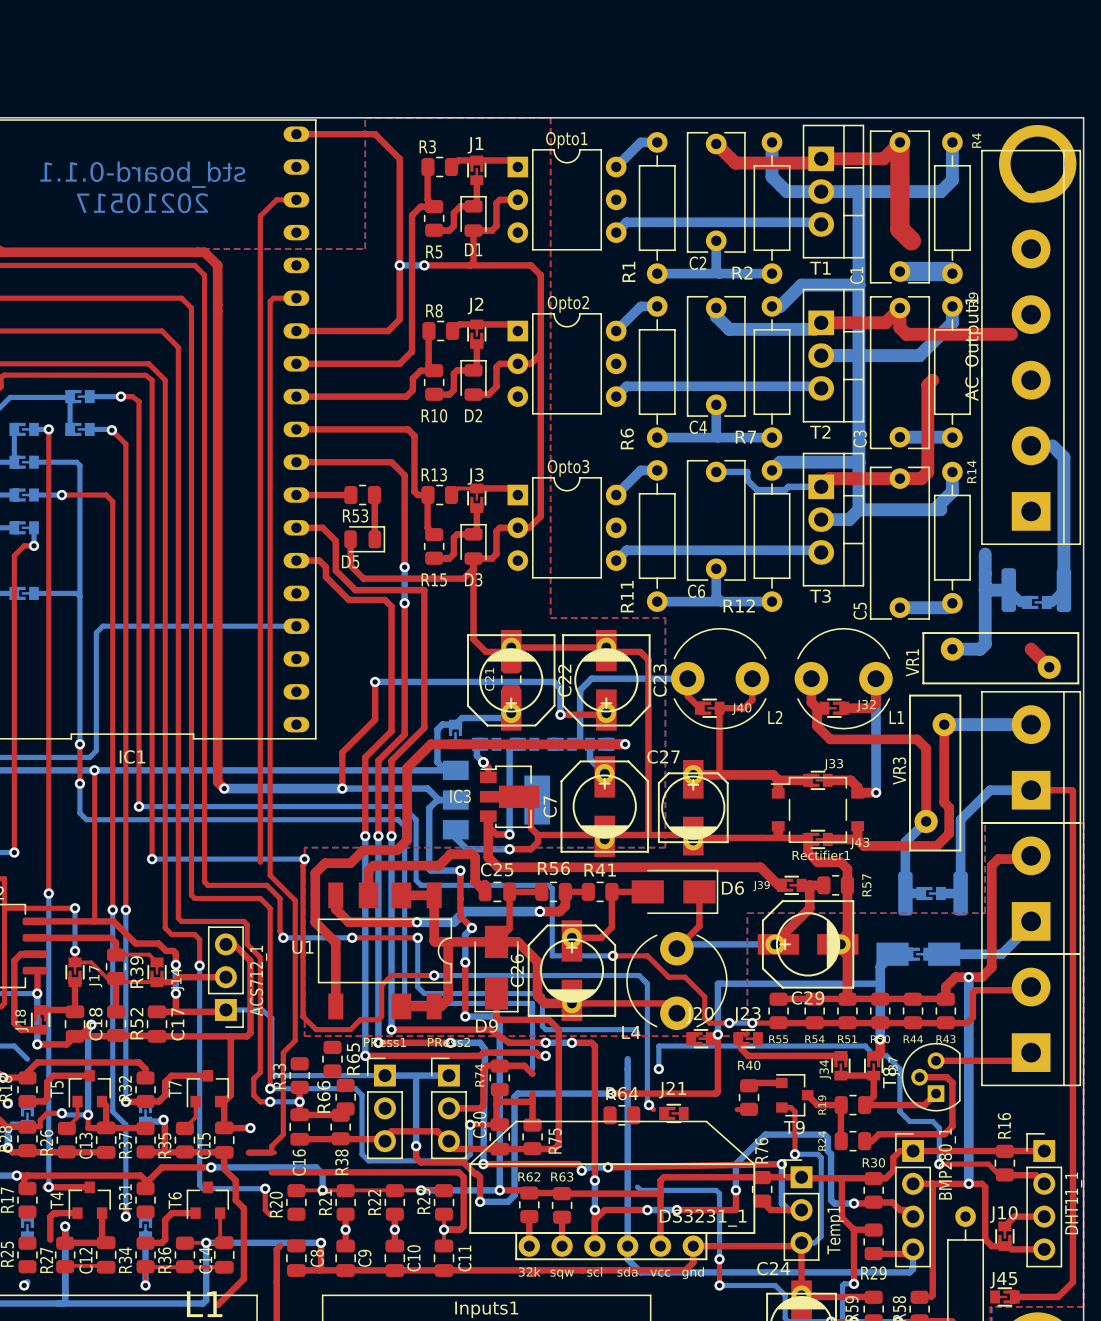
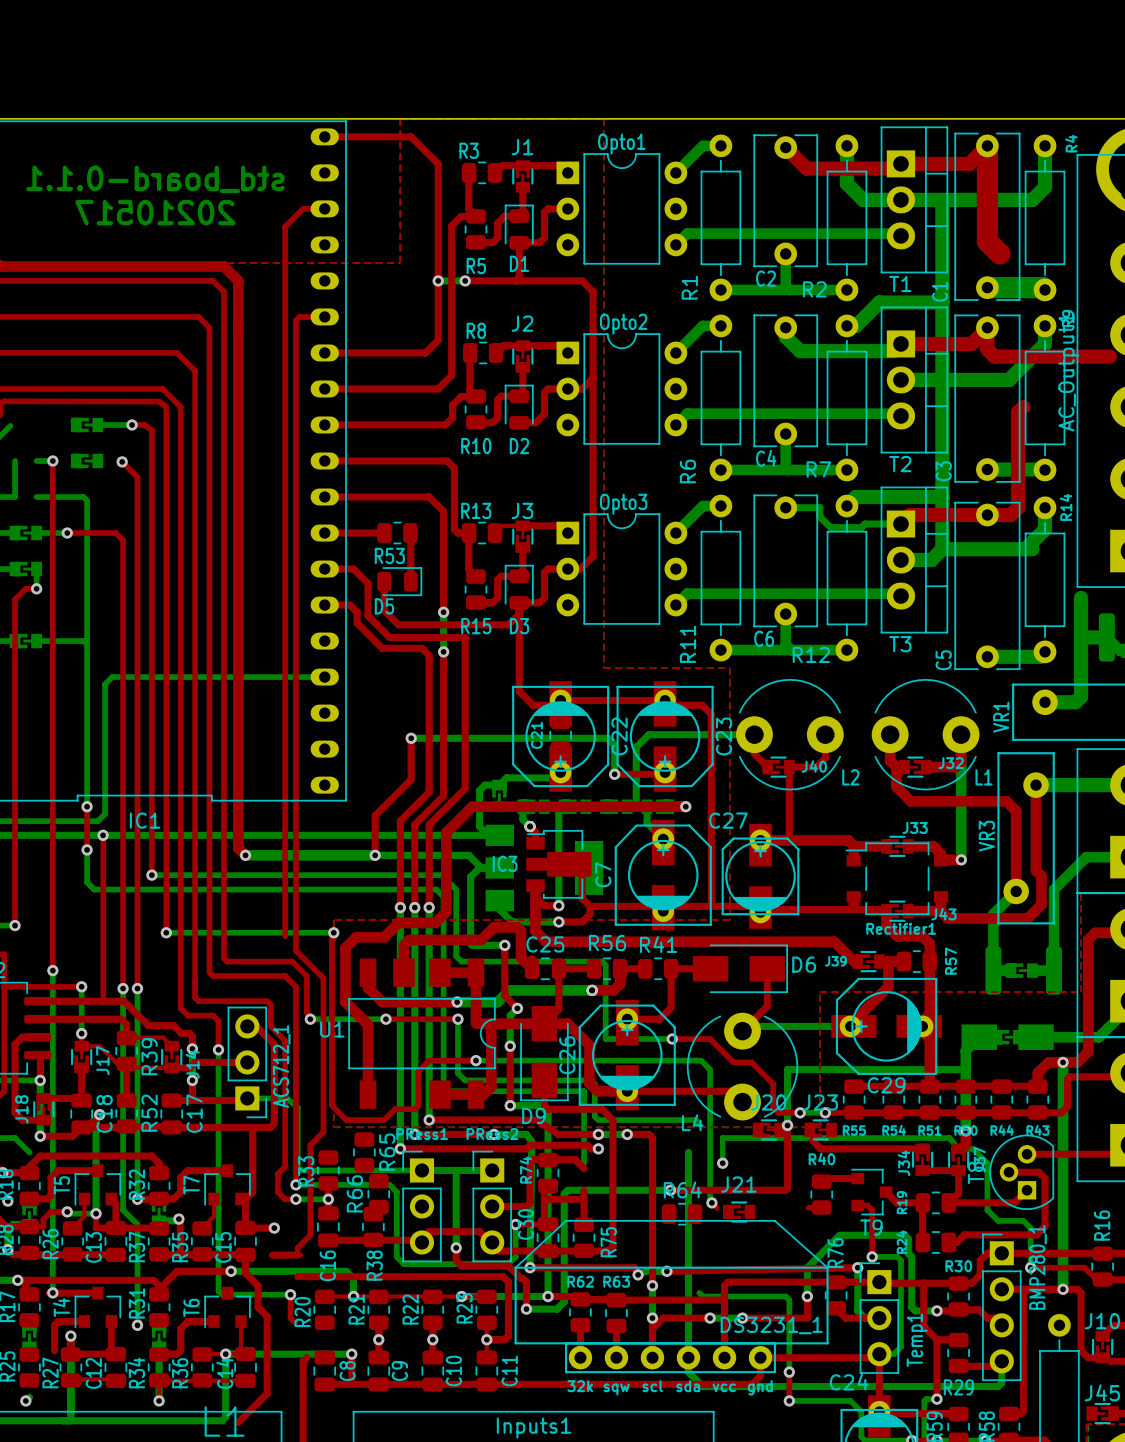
bottom track: (10, 397) (70, 396) (70, 429) -> none
part: (24, 429) -> none
bottom track: (89, 429) (111, 429) -> none
part: (24, 462) -> none
top track: (339, 1113) (340, 1114) (299, 1114) -> none

